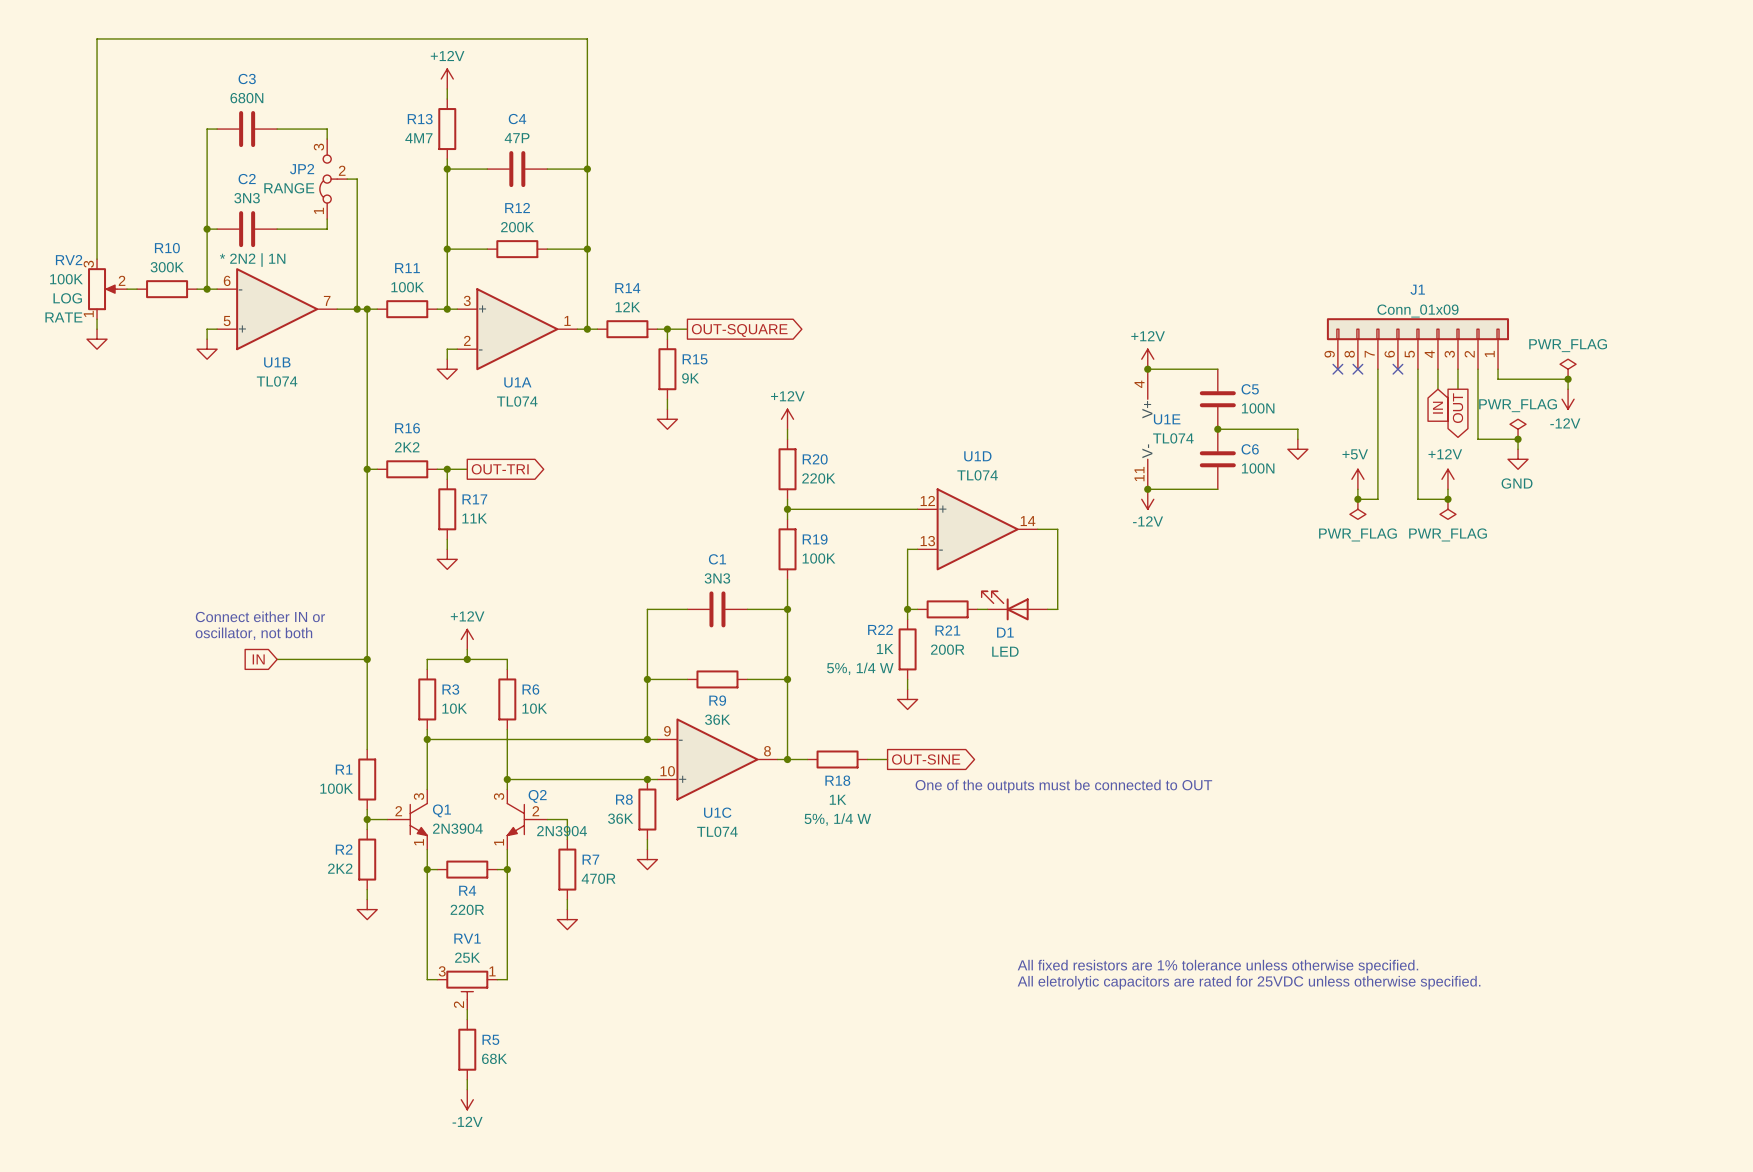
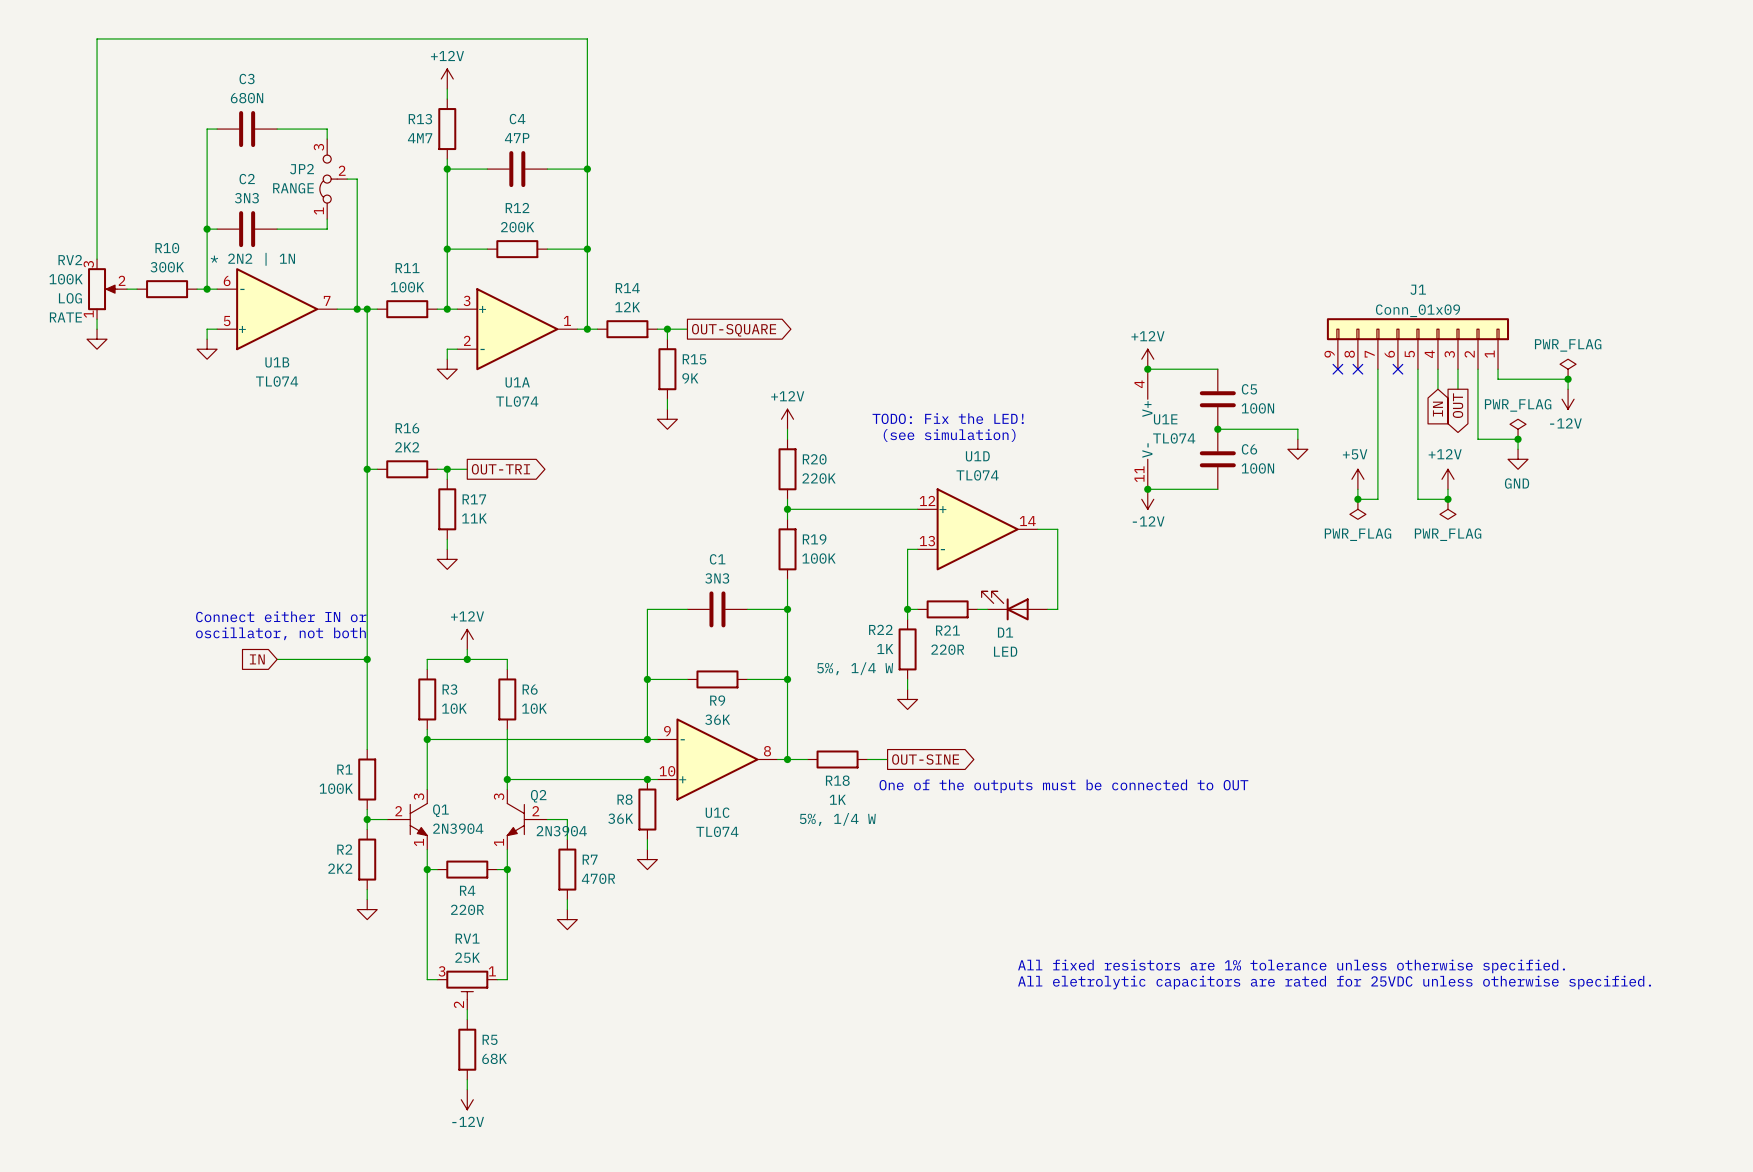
text: none -> TODO: Fix the LED! (948, 418)
text: none -> (see simulation) (949, 435)
R21 value: 200R (947, 649) -> 220R (947, 649)

